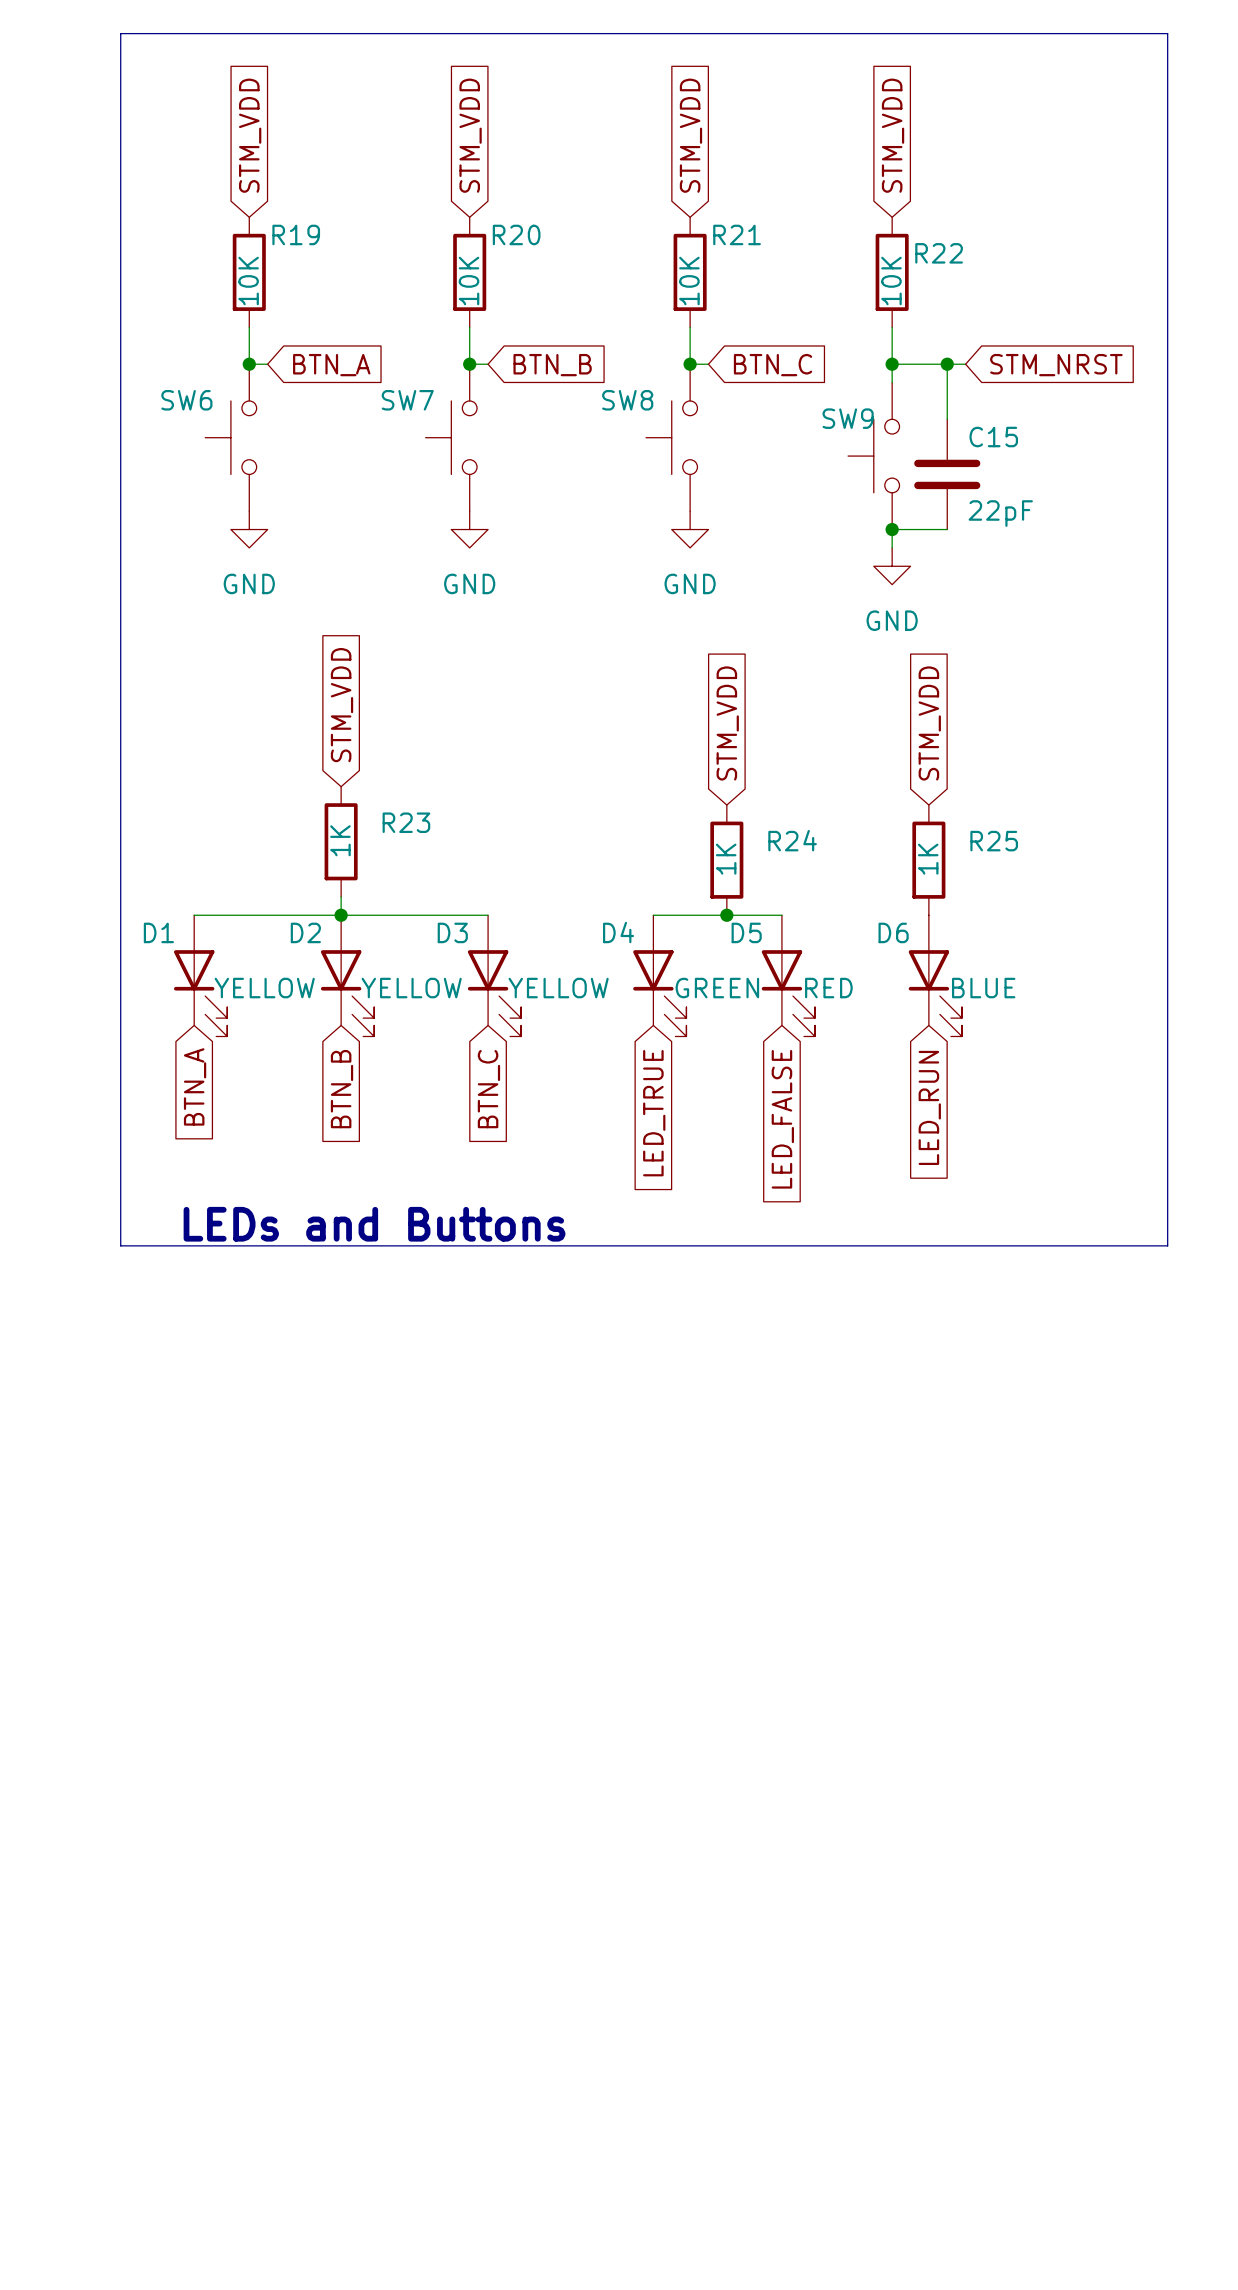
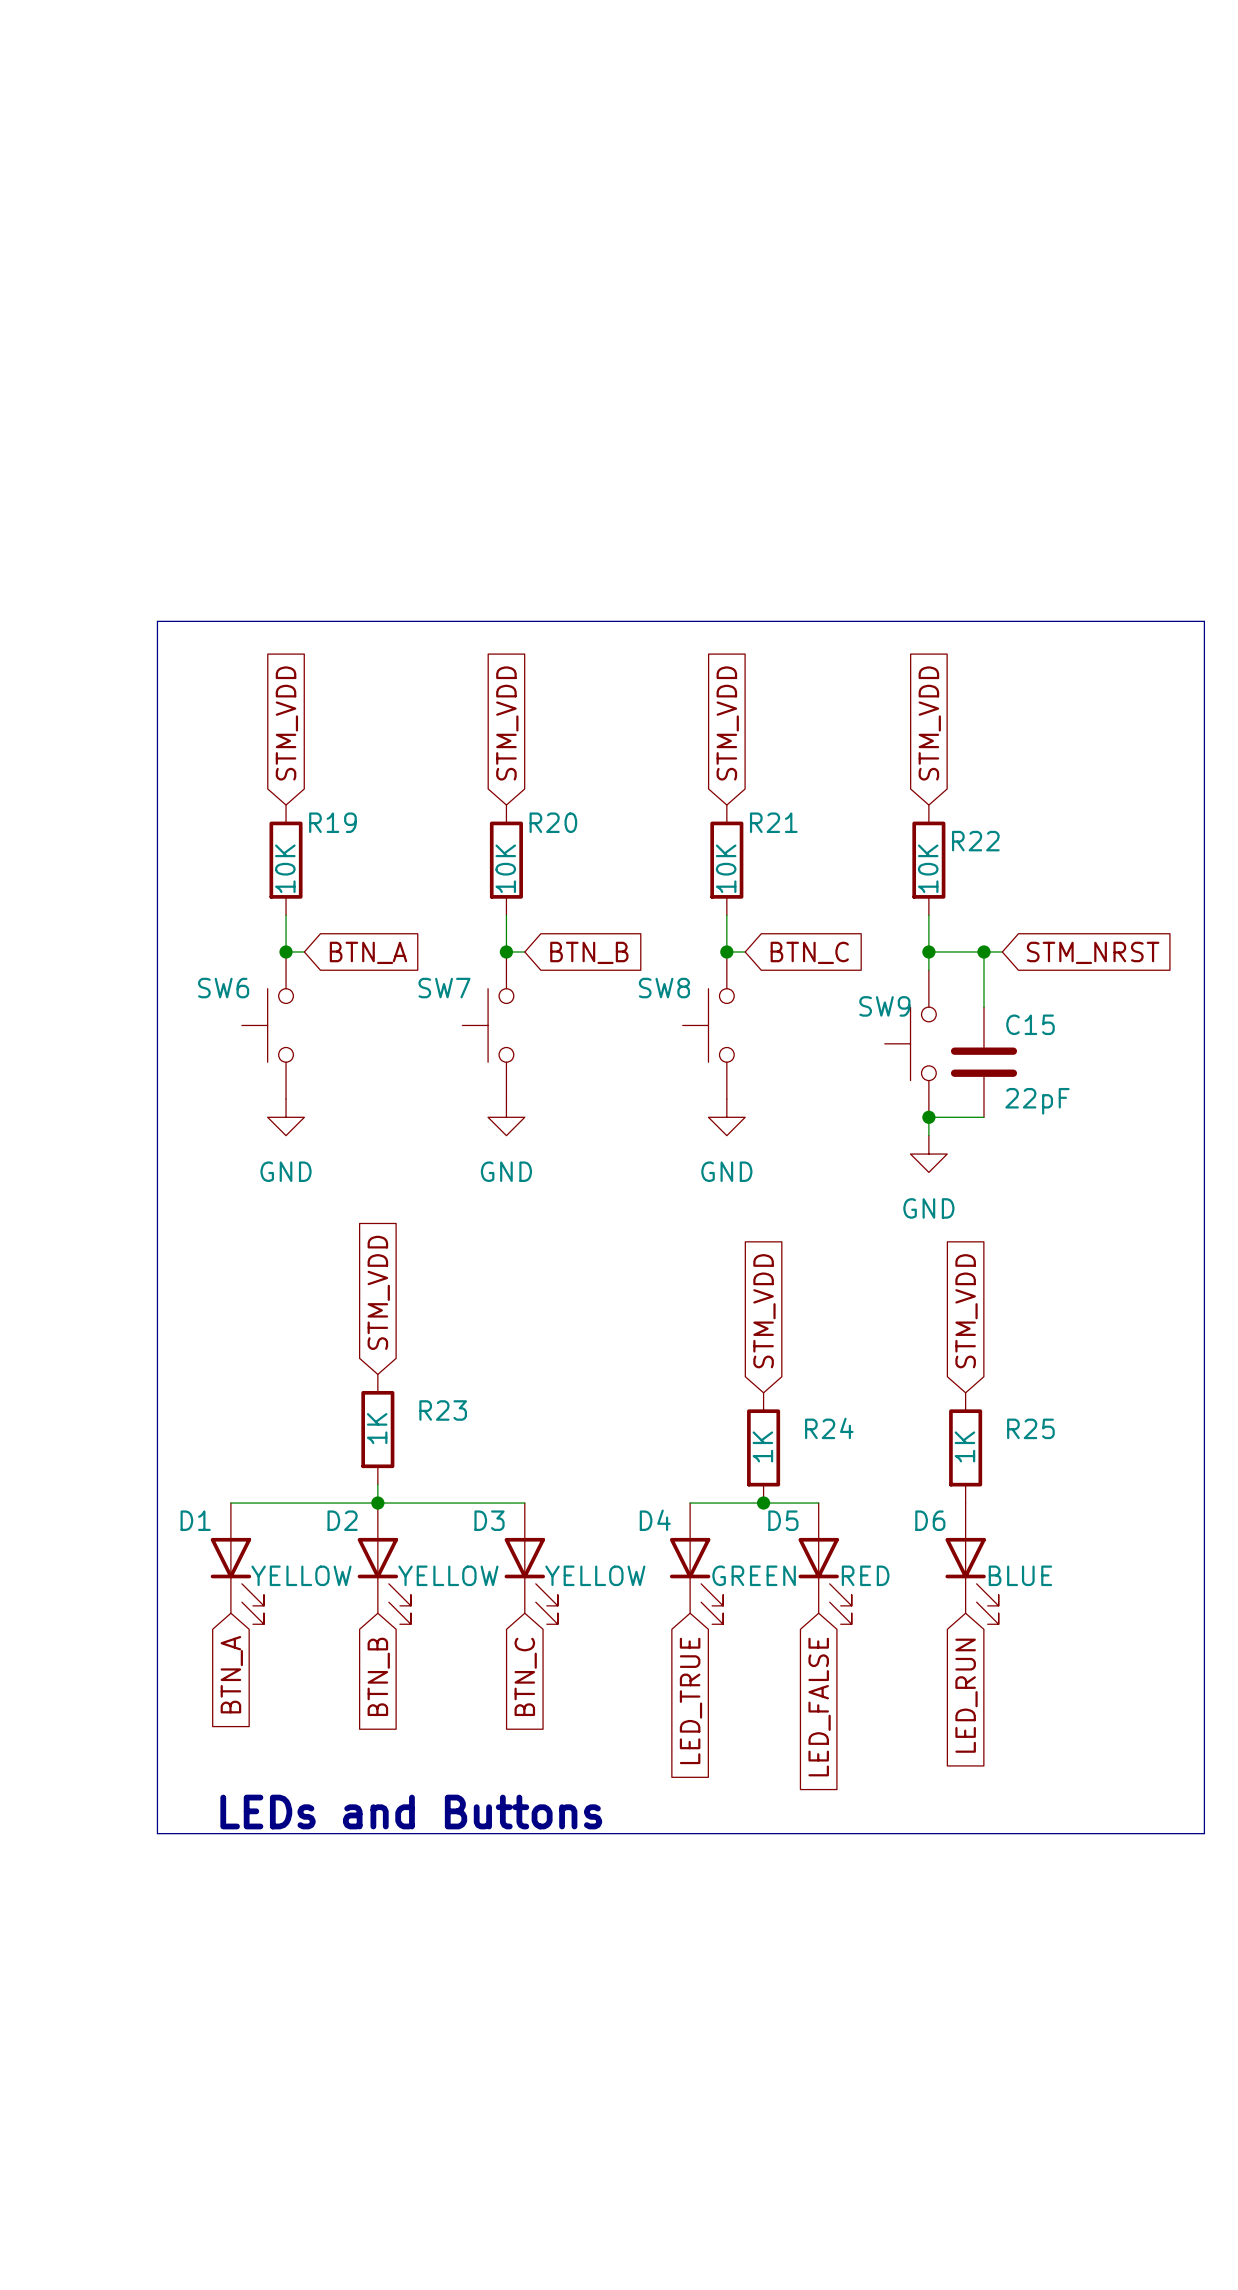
line: (120, 33) (120, 1245) (1167, 1245) (1167, 33) (120, 33) -> none
global label: STM_VDD (250, 135) -> none
global label: STM_VDD (470, 135) -> none
global label: STM_VDD (690, 135) -> none
global label: STM_VDD (893, 135) -> none
R19 position: (249, 272) -> (286, 860)
R20 position: (469, 272) -> (506, 860)
R21: 10K (690, 272) -> none
R22: 10K (892, 272) -> none
wire: (249, 327) (249, 364) (267, 364) -> none
wire: (469, 327) (469, 364) (488, 364) -> none
wire: (690, 327) (690, 364) (708, 364) -> none
wire: (892, 327) (892, 382) -> none
junction: (249, 364) -> none
junction: (469, 364) -> none
junction: (690, 364) -> none
wire: (892, 364) (965, 364) -> none
junction: (892, 364) -> none
wire: (947, 364) (947, 419) -> none
junction: (947, 364) -> none
global label: BTN_A (331, 365) -> none
global label: BTN_B (552, 365) -> none
global label: BTN_C (773, 365) -> none
global label: STM_NRST (1056, 365) -> none
SW6 position: (230, 437) -> (267, 1025)
SW7 position: (451, 437) -> (488, 1025)
SW8 position: (671, 437) -> (708, 1025)
SW9 position: (873, 456) -> (910, 1043)
C15 position: (947, 474) -> (983, 1062)
power symbol: GND (249, 529) -> none
power symbol: GND (469, 529) -> none
power symbol: GND (690, 529) -> none
junction: (892, 529) -> none
wire: (947, 529) (892, 529) (892, 547) -> none
power symbol: GND (892, 566) -> none
line: none -> (157, 621) (157, 1833) (1204, 1833) (1204, 621) (157, 621)
global label position: STM_VDD (342, 705) -> STM_VDD (286, 723)
global label: none -> STM_VDD (507, 723)
R24 name: R24 (792, 840) -> R21 (773, 822)
R23 position: (341, 841) -> (377, 1429)
R25 name: R25 (994, 841) -> R22 (975, 841)
R24 value: 1K (726, 859) -> 10K (726, 868)
R25 value: 1K (928, 859) -> 10K (928, 868)
wire: (341, 896) (341, 915) -> none
wire: (194, 915) (488, 915) -> none
wire: none -> (286, 915) (286, 951) (304, 951)
junction position: (341, 915) -> (286, 951)
wire: none -> (506, 915) (506, 951) (524, 951)
wire: (653, 915) (781, 915) -> none
wire: none -> (726, 915) (726, 951) (745, 951)
junction position: (726, 915) -> (726, 951)
junction: none -> (506, 951)
wire: none -> (928, 951) (1002, 951)
junction: none -> (928, 951)
wire: none -> (983, 951) (983, 1007)
junction: none -> (983, 951)
global label: none -> STM_NRST (1093, 952)
D1 position: (200, 975) -> (237, 1563)
D2 position: (347, 975) -> (384, 1563)
D3 position: (494, 975) -> (531, 1563)
D4 position: (659, 975) -> (696, 1563)
D5 position: (788, 975) -> (825, 1563)
D6 position: (935, 975) -> (972, 1563)
global label rotation: 0° (195, 1086) -> 90° counterclockwise (368, 952)
global label position: BTN_A (195, 1086) -> BTN_A (368, 952)
global label rotation: 0° (342, 1089) -> 90° counterclockwise (589, 952)
global label position: BTN_B (342, 1089) -> BTN_B (589, 952)
global label rotation: 0° (488, 1089) -> 90° counterclockwise (809, 952)
global label position: BTN_C (488, 1089) -> BTN_C (809, 952)
global label: LED_RUN (929, 1107) -> none
global label: LED_TRUE (654, 1113) -> none
power symbol: none -> GND (286, 1117)
power symbol: none -> GND (506, 1117)
power symbol: none -> GND (726, 1117)
junction: none -> (928, 1117)
wire: none -> (983, 1117) (928, 1117) (928, 1135)
global label: LED_FALSE (782, 1119) -> none
power symbol: none -> GND (928, 1154)
text: LEDs and Buttons (374, 1224) -> none
global label: none -> STM_VDD (378, 1292)
global label: none -> STM_VDD (764, 1311)
global label: none -> STM_VDD (966, 1311)
R24: none -> 1K (763, 1447)
R25: none -> 1K (965, 1447)
wire: none -> (377, 1484) (377, 1503)
wire: none -> (230, 1503) (524, 1503)
junction: none -> (377, 1503)
wire: none -> (690, 1503) (818, 1503)
junction: none -> (763, 1503)
global label: none -> BTN_A (231, 1674)
global label: none -> BTN_B (378, 1676)
global label: none -> BTN_C (525, 1676)
global label: none -> LED_RUN (966, 1695)
global label: none -> LED_TRUE (690, 1700)
global label: none -> LED_FALSE (819, 1707)
text: none -> LEDs and Buttons (411, 1812)

